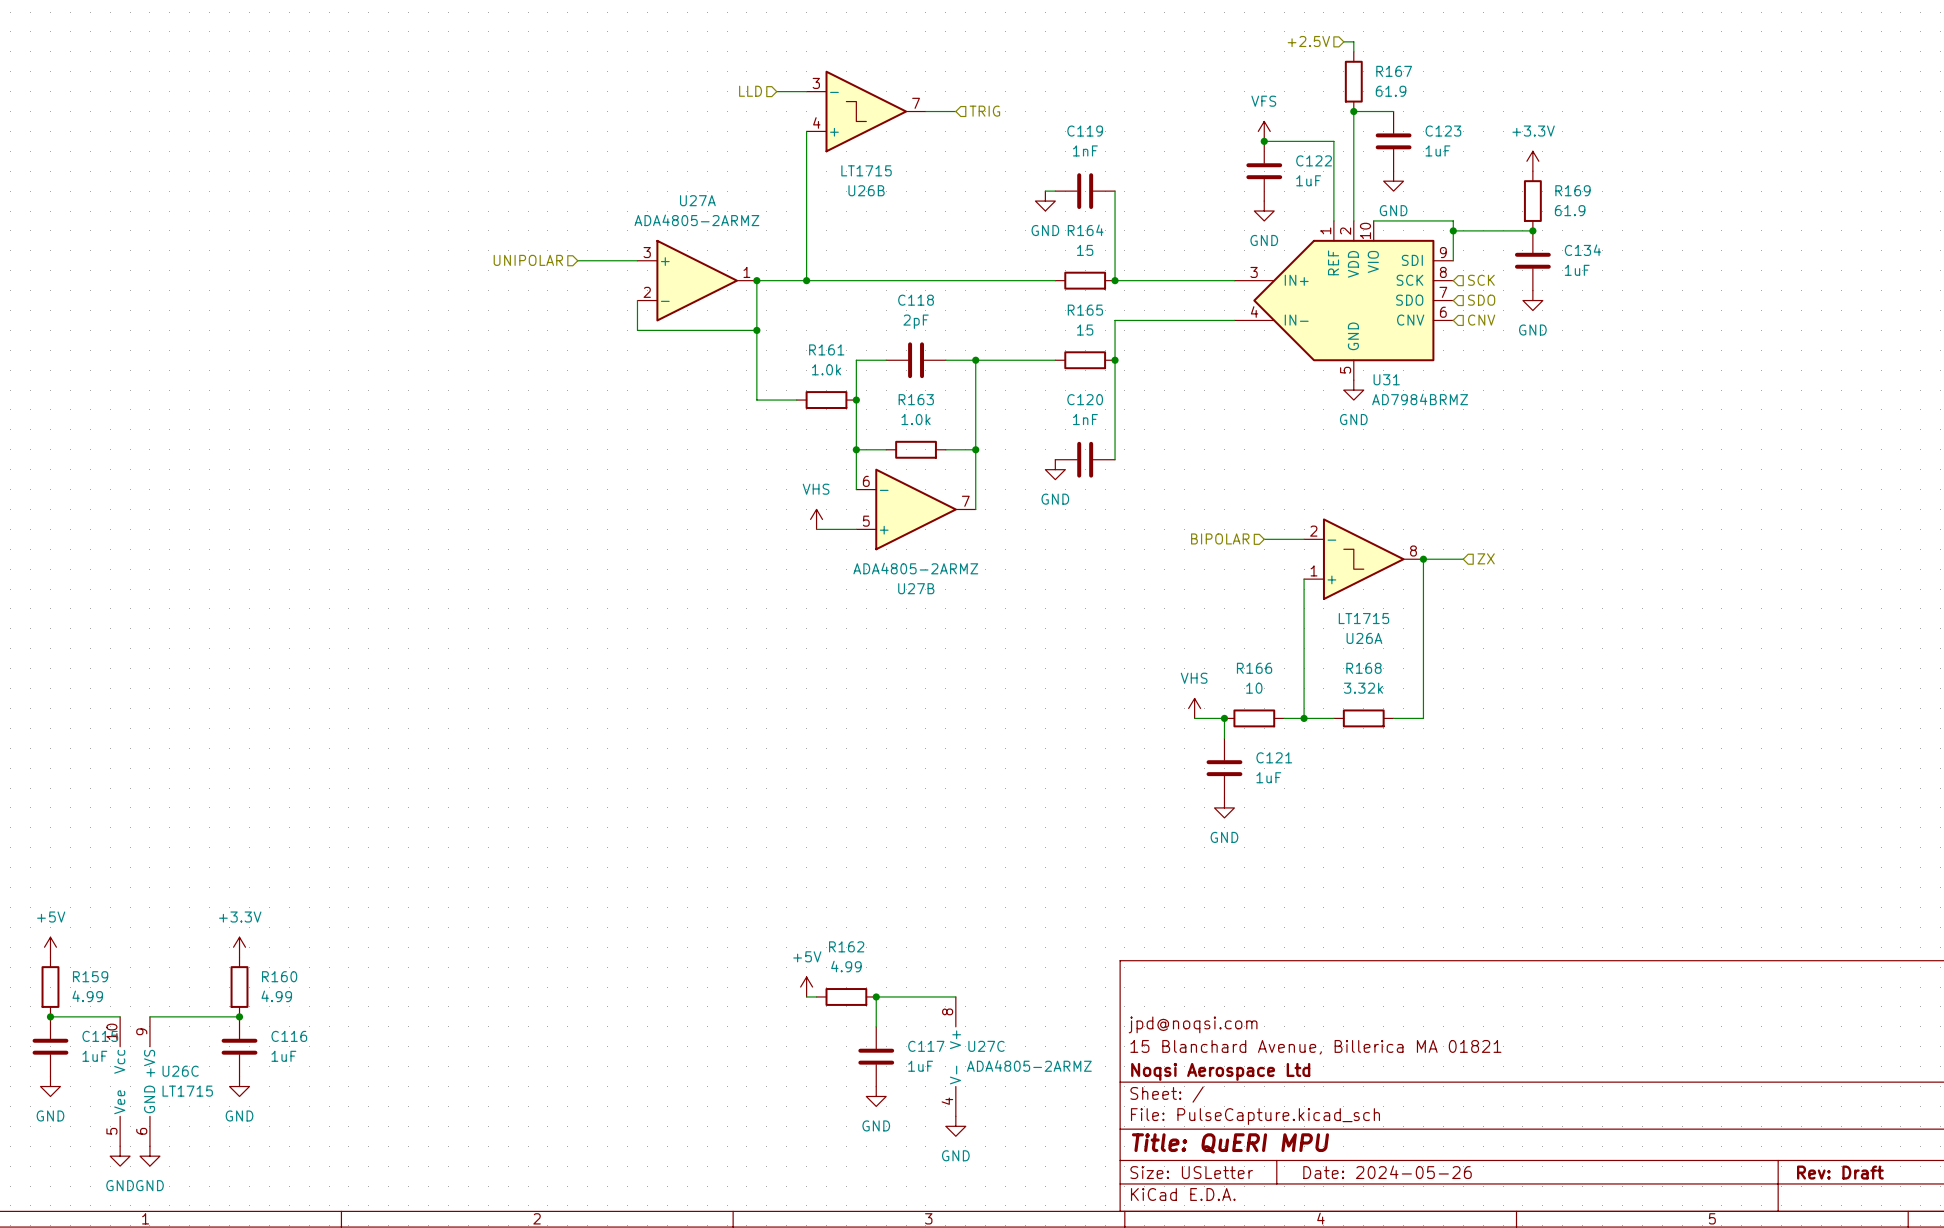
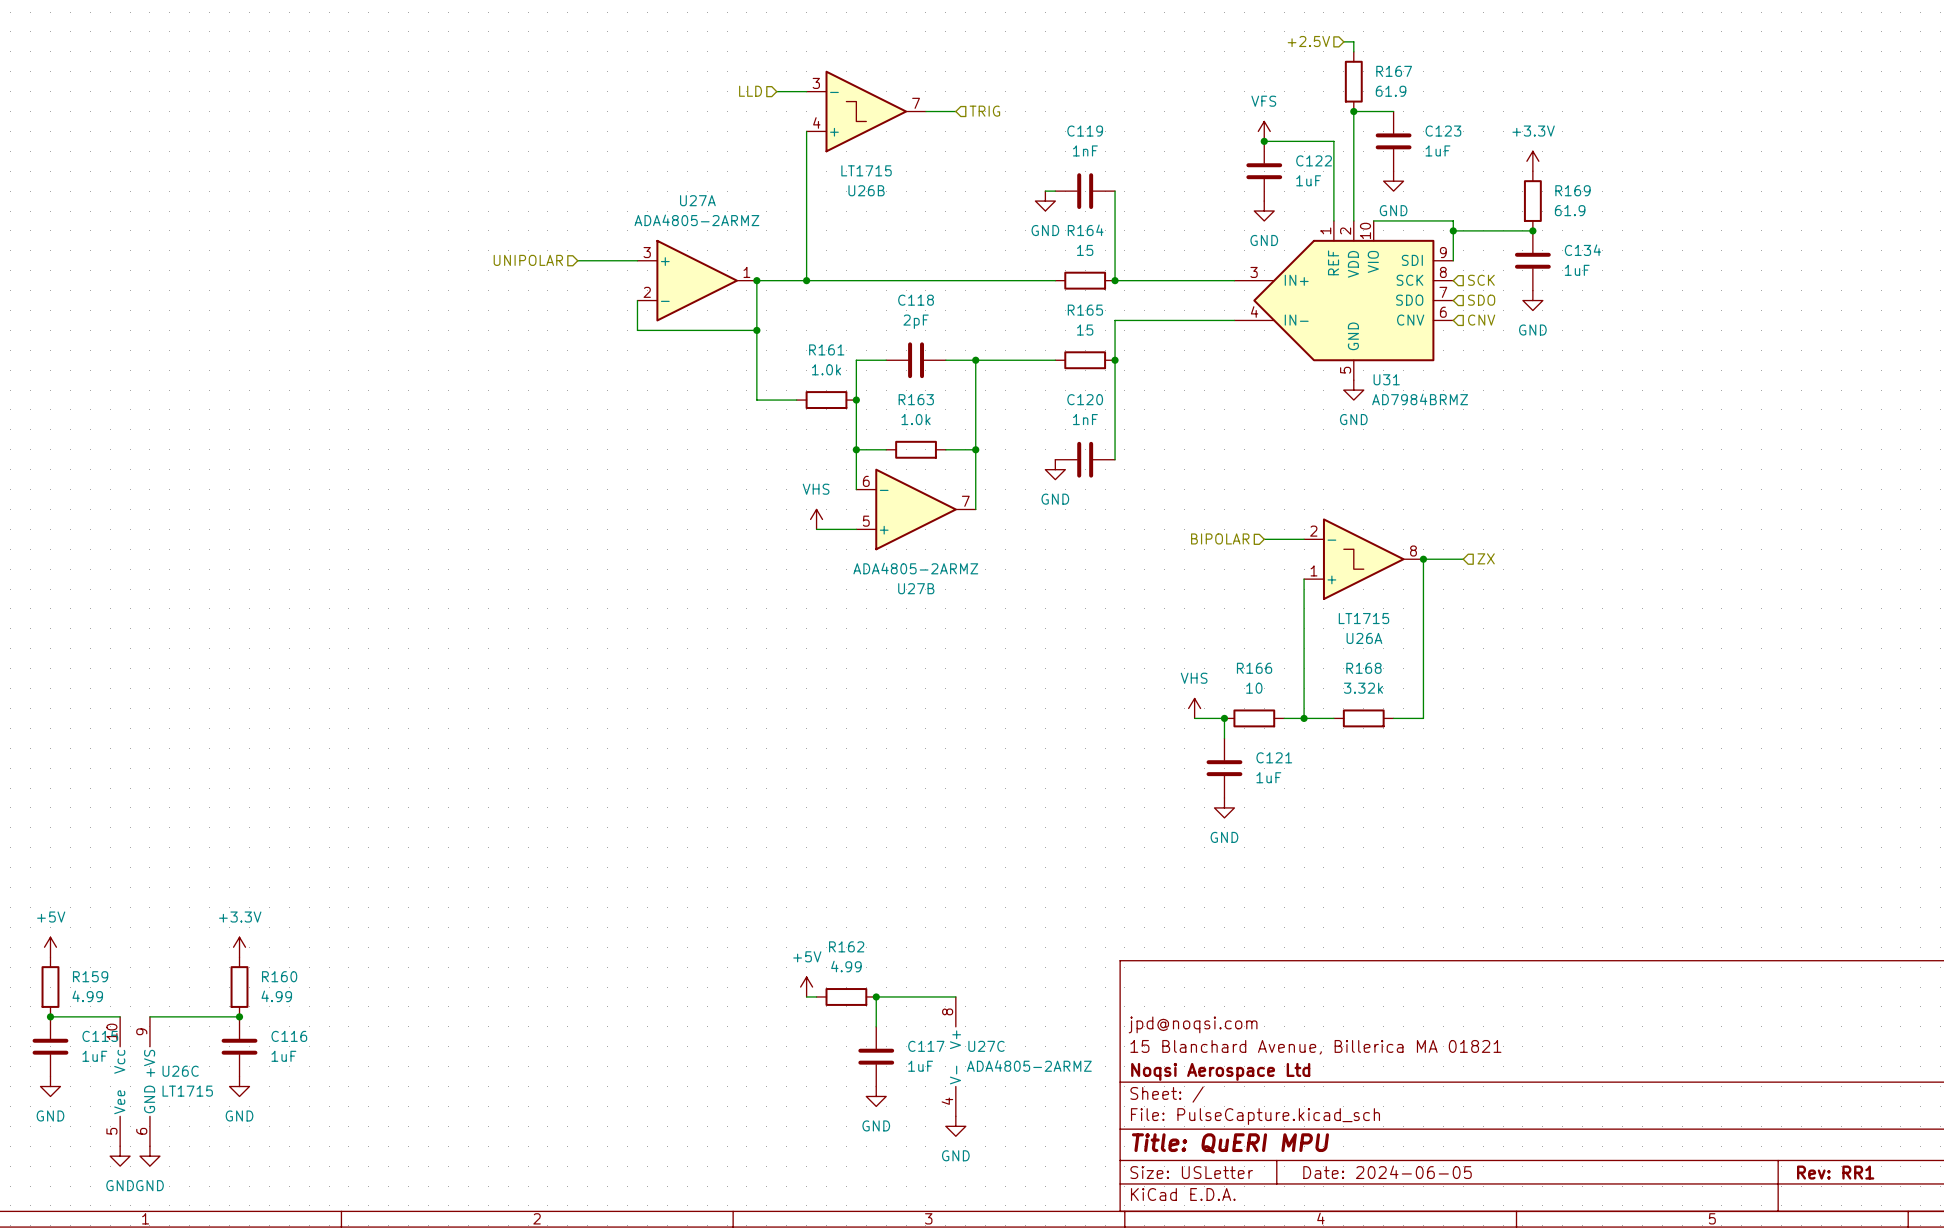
title block: Date: 2024-05-26 (1387, 1172) -> Date: 2024-06-05 (1387, 1172)
title block: Rev: Draft (1840, 1172) -> Rev: RR1 (1835, 1172)

